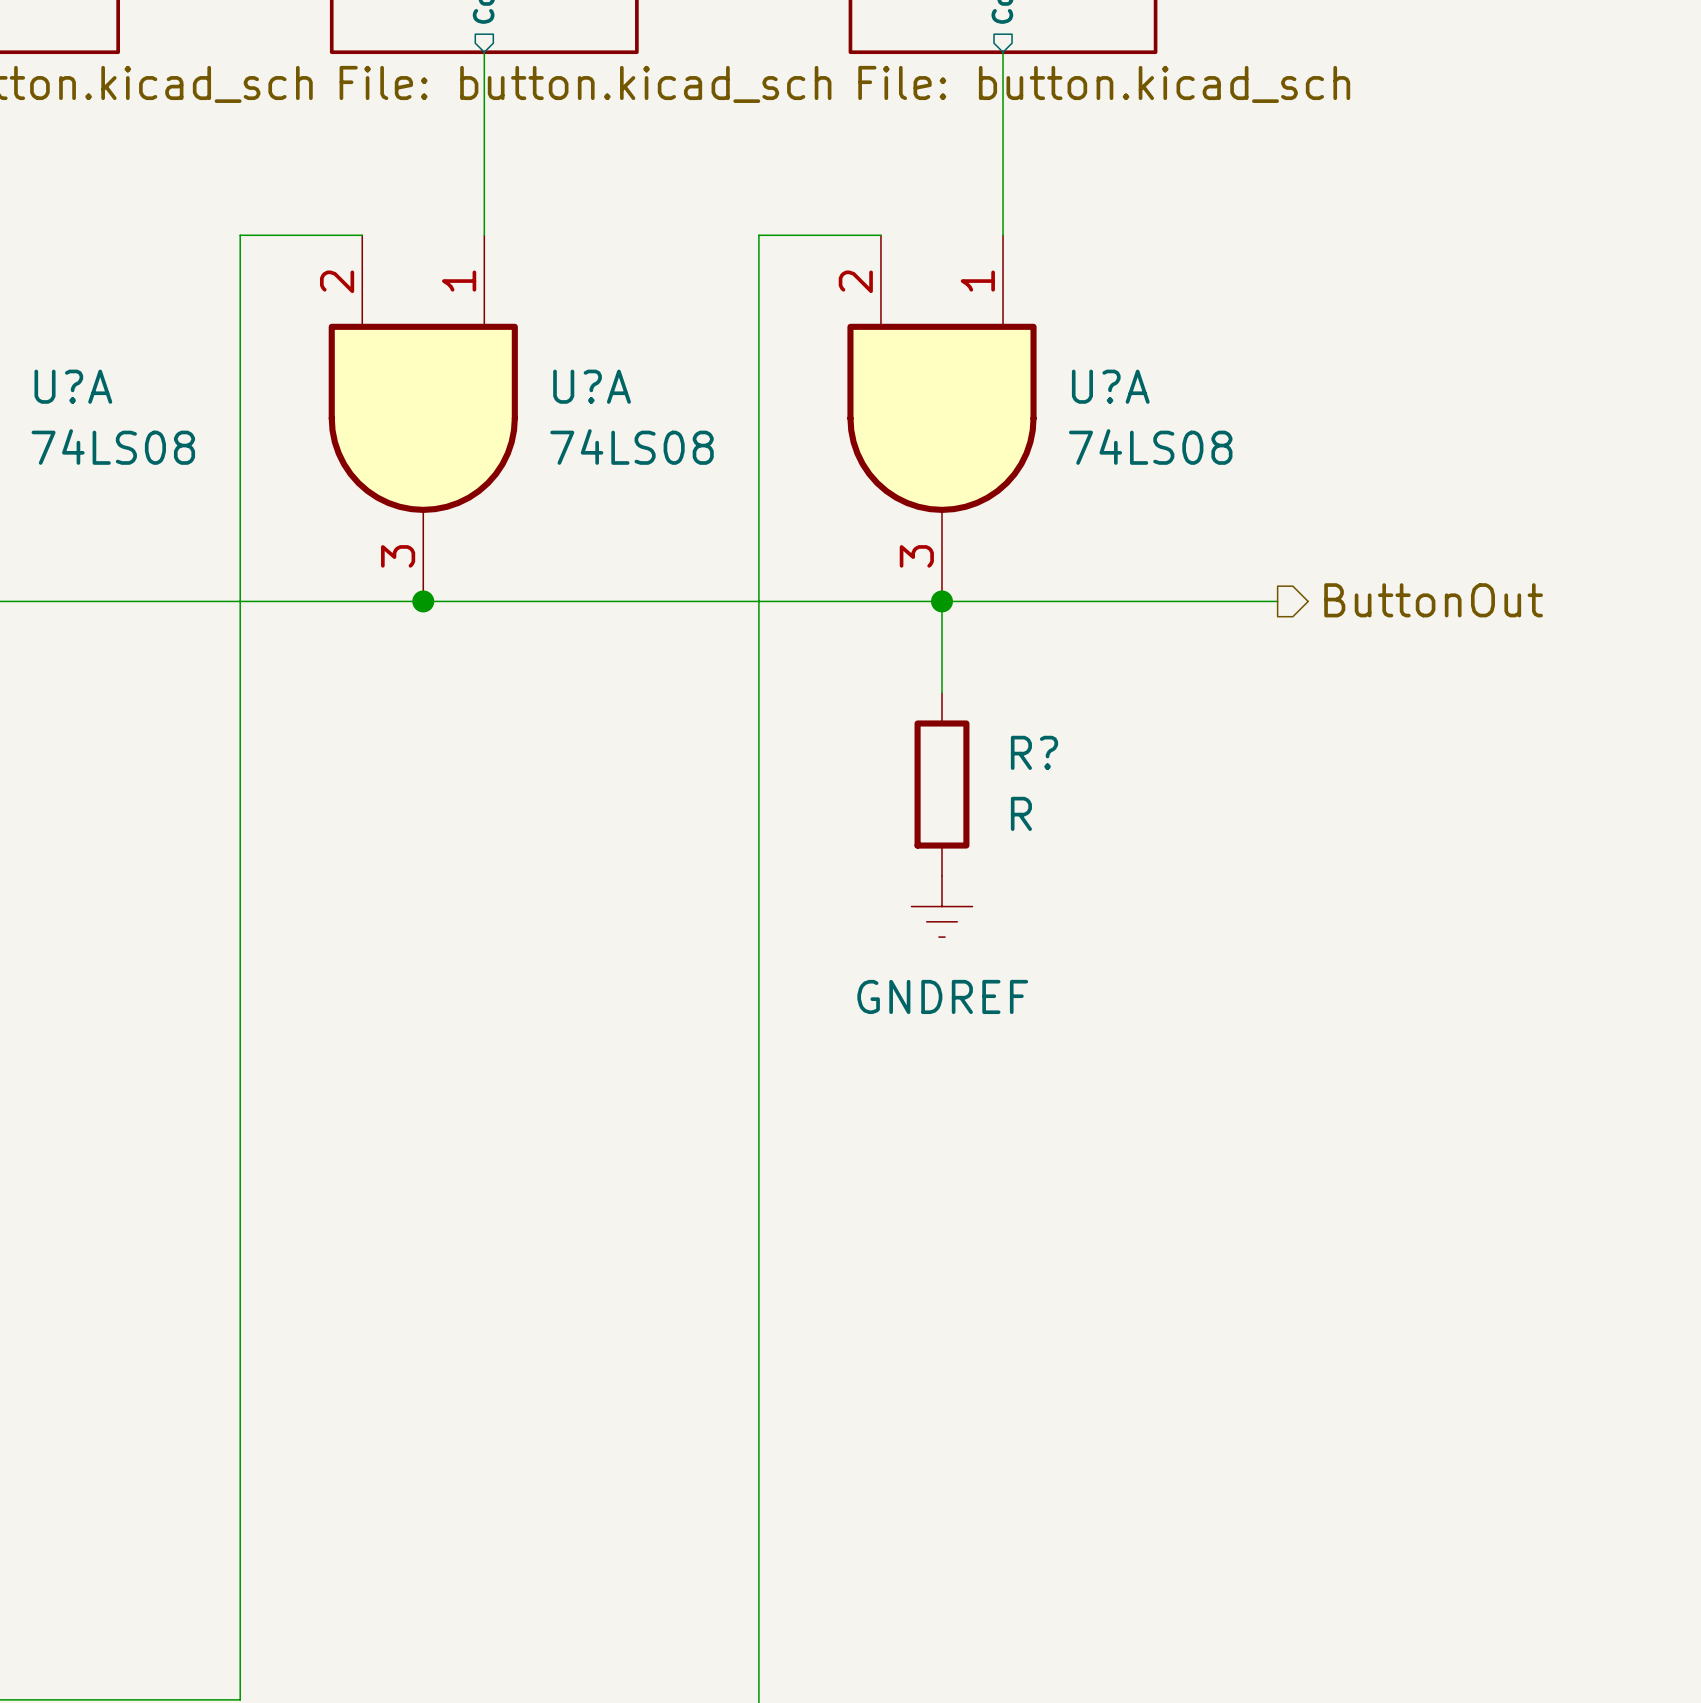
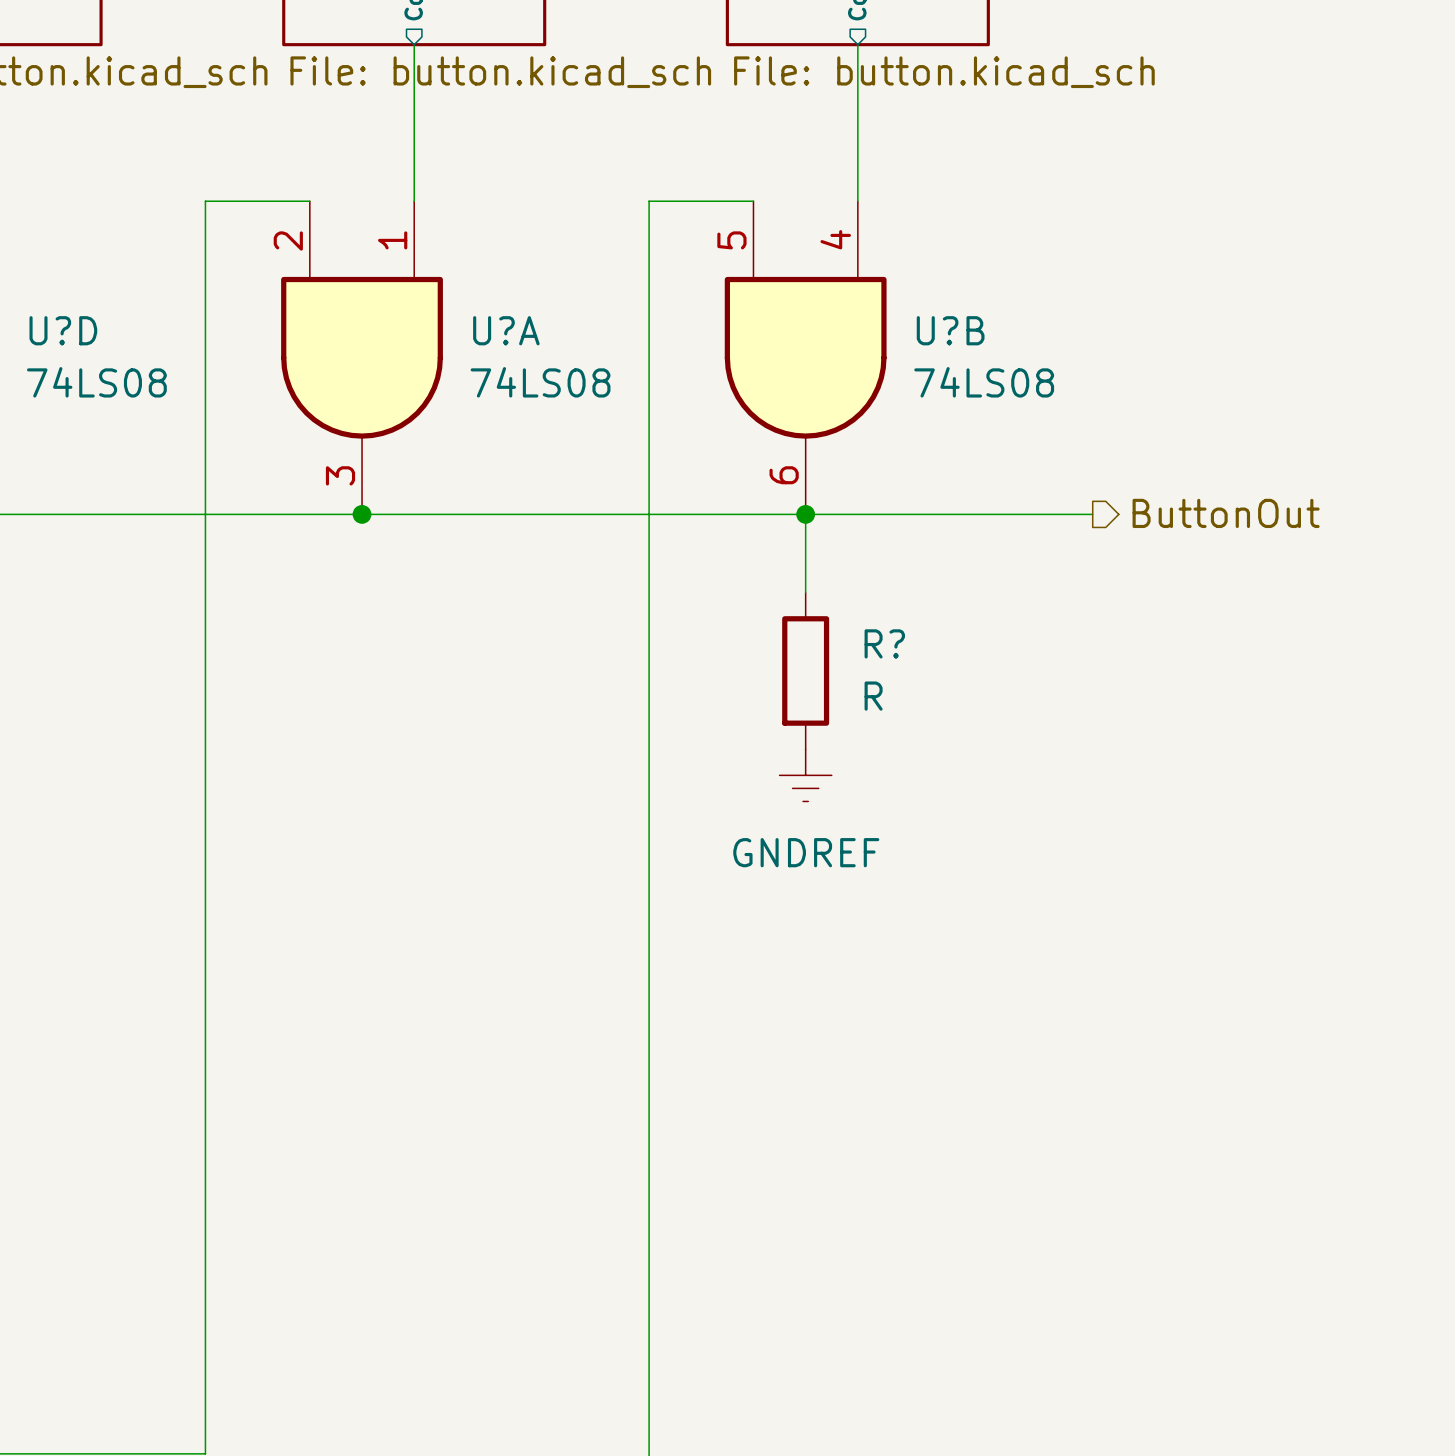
U?A pin number: 2 (855, 281) -> 5 (731, 240)
U?A pin number: 1 (977, 281) -> 4 (835, 239)
U?A name: U?A (73, 386) -> U?D (63, 330)
U?A name: U?A (1110, 386) -> U?B (950, 330)
U?A pin number: 3 (916, 556) -> 6 (784, 475)

